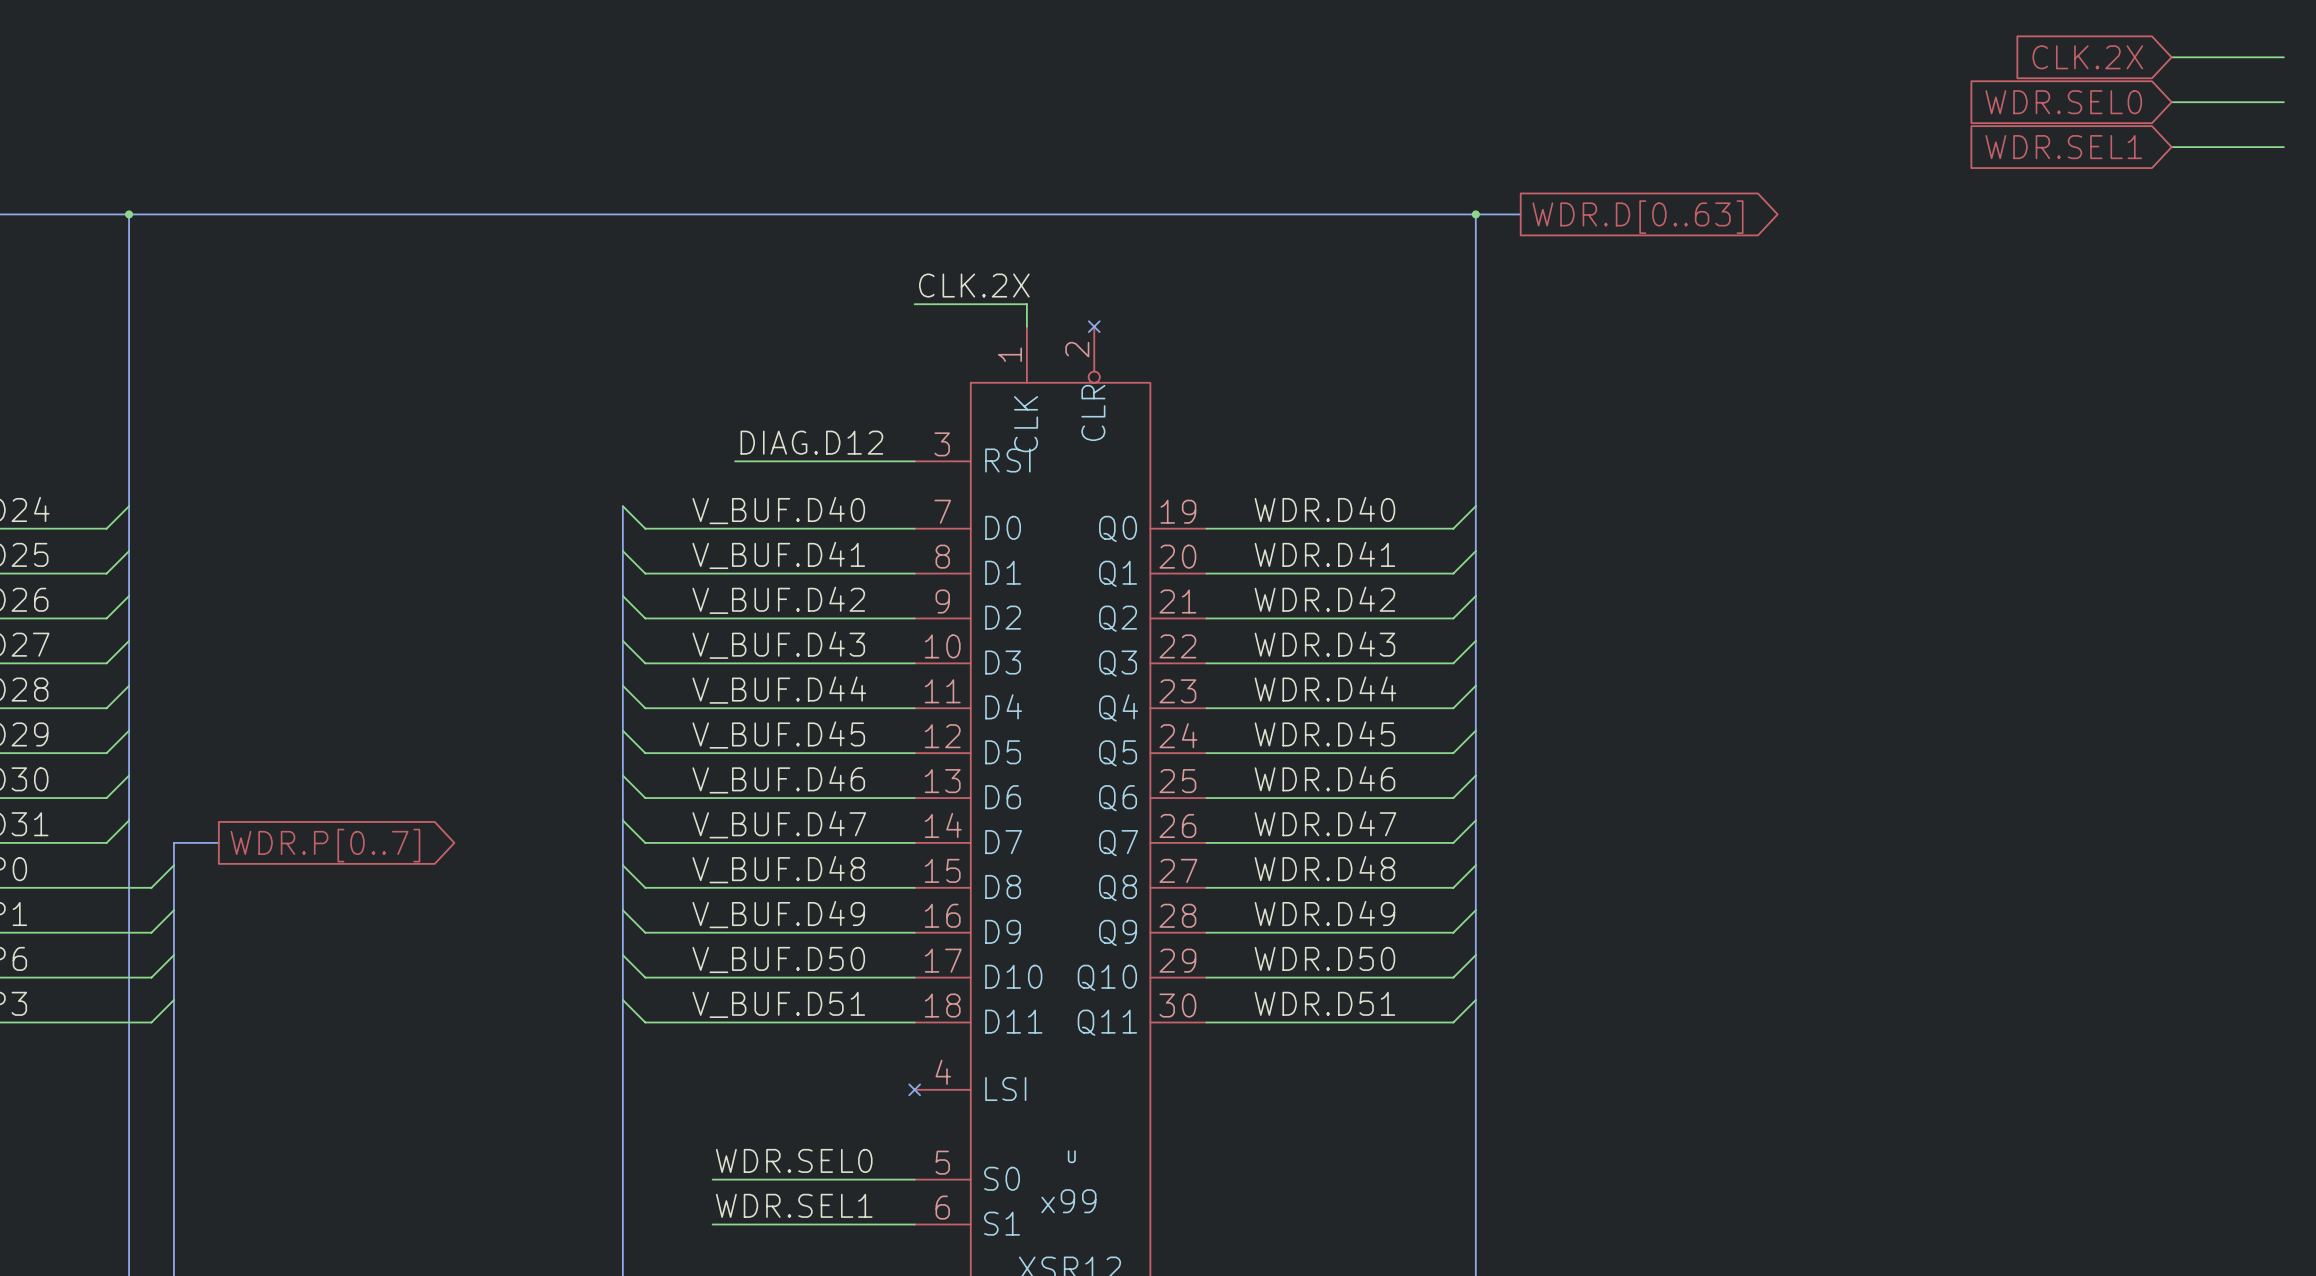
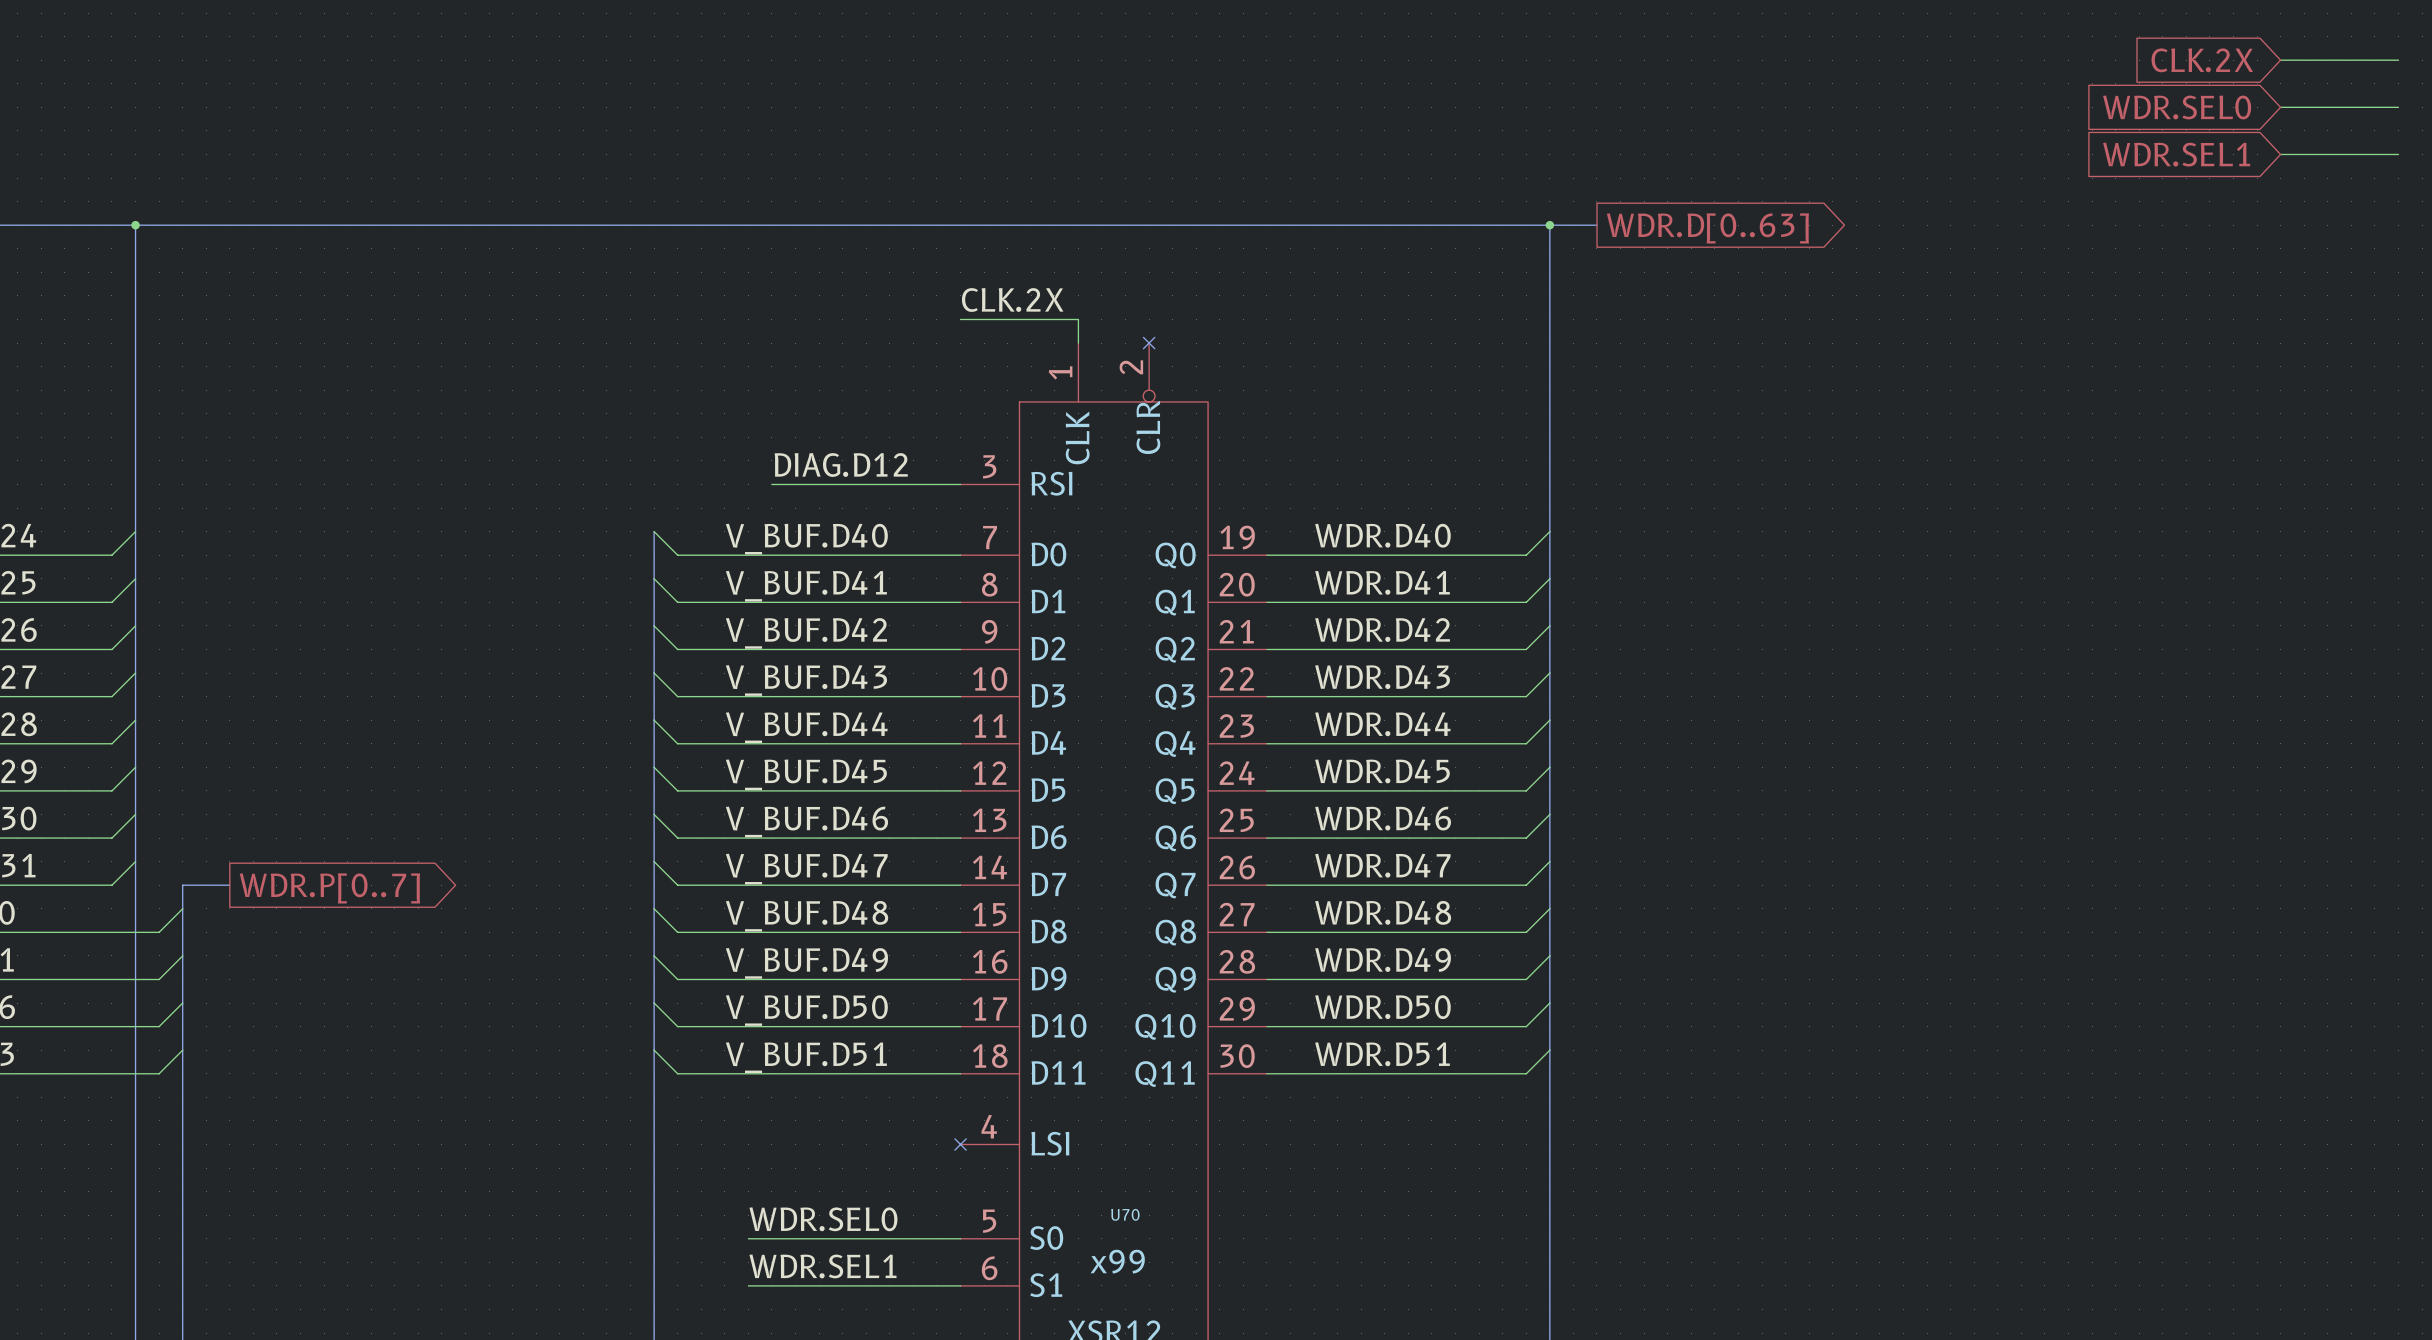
U name: U (1071, 1156) -> U70 (1125, 1214)

